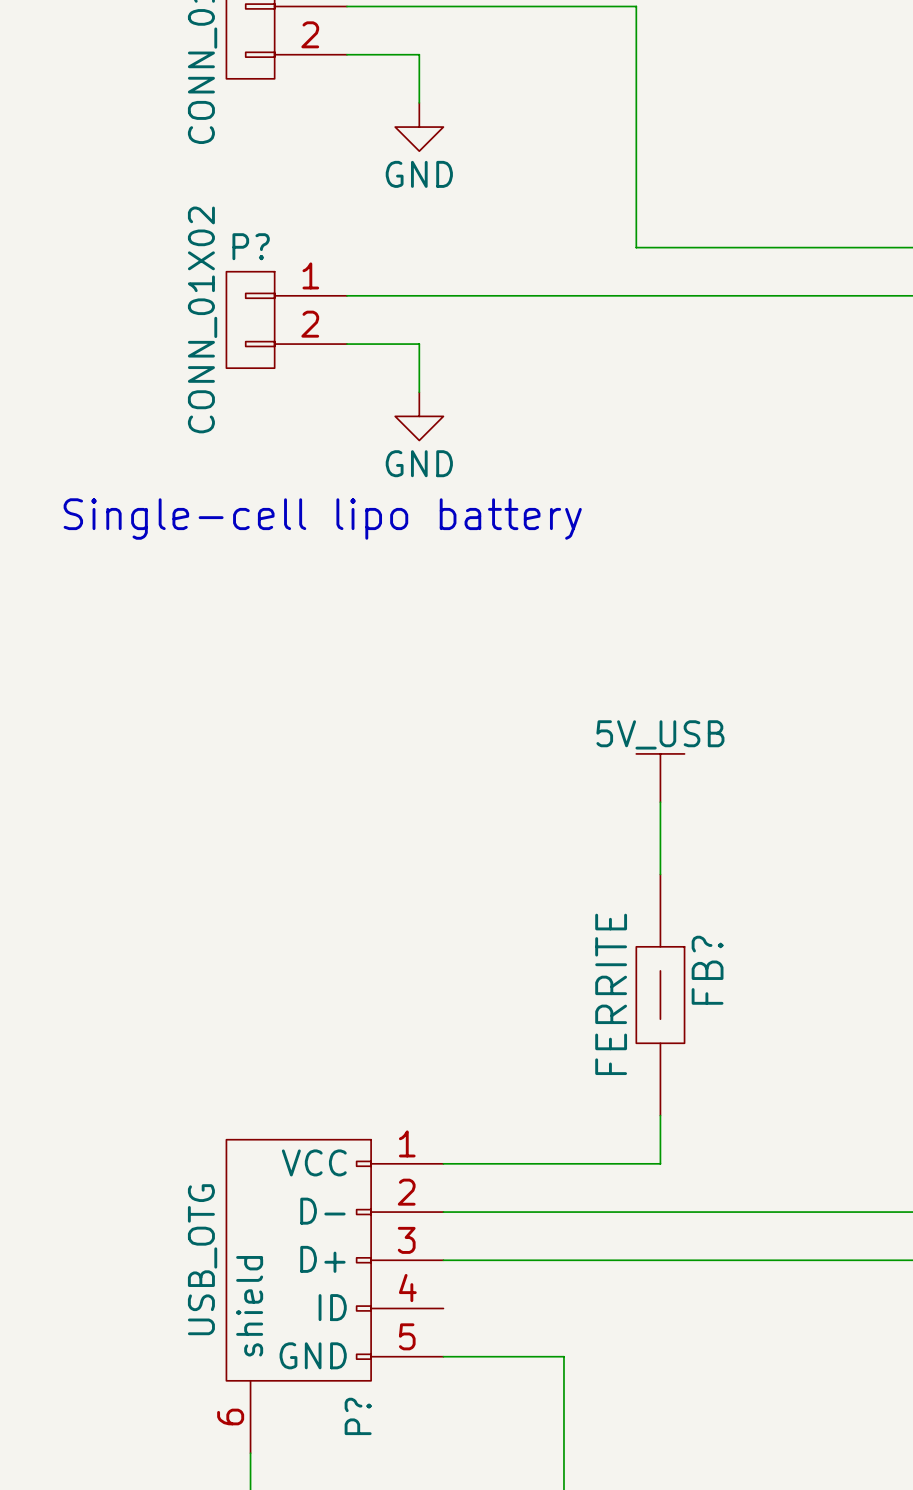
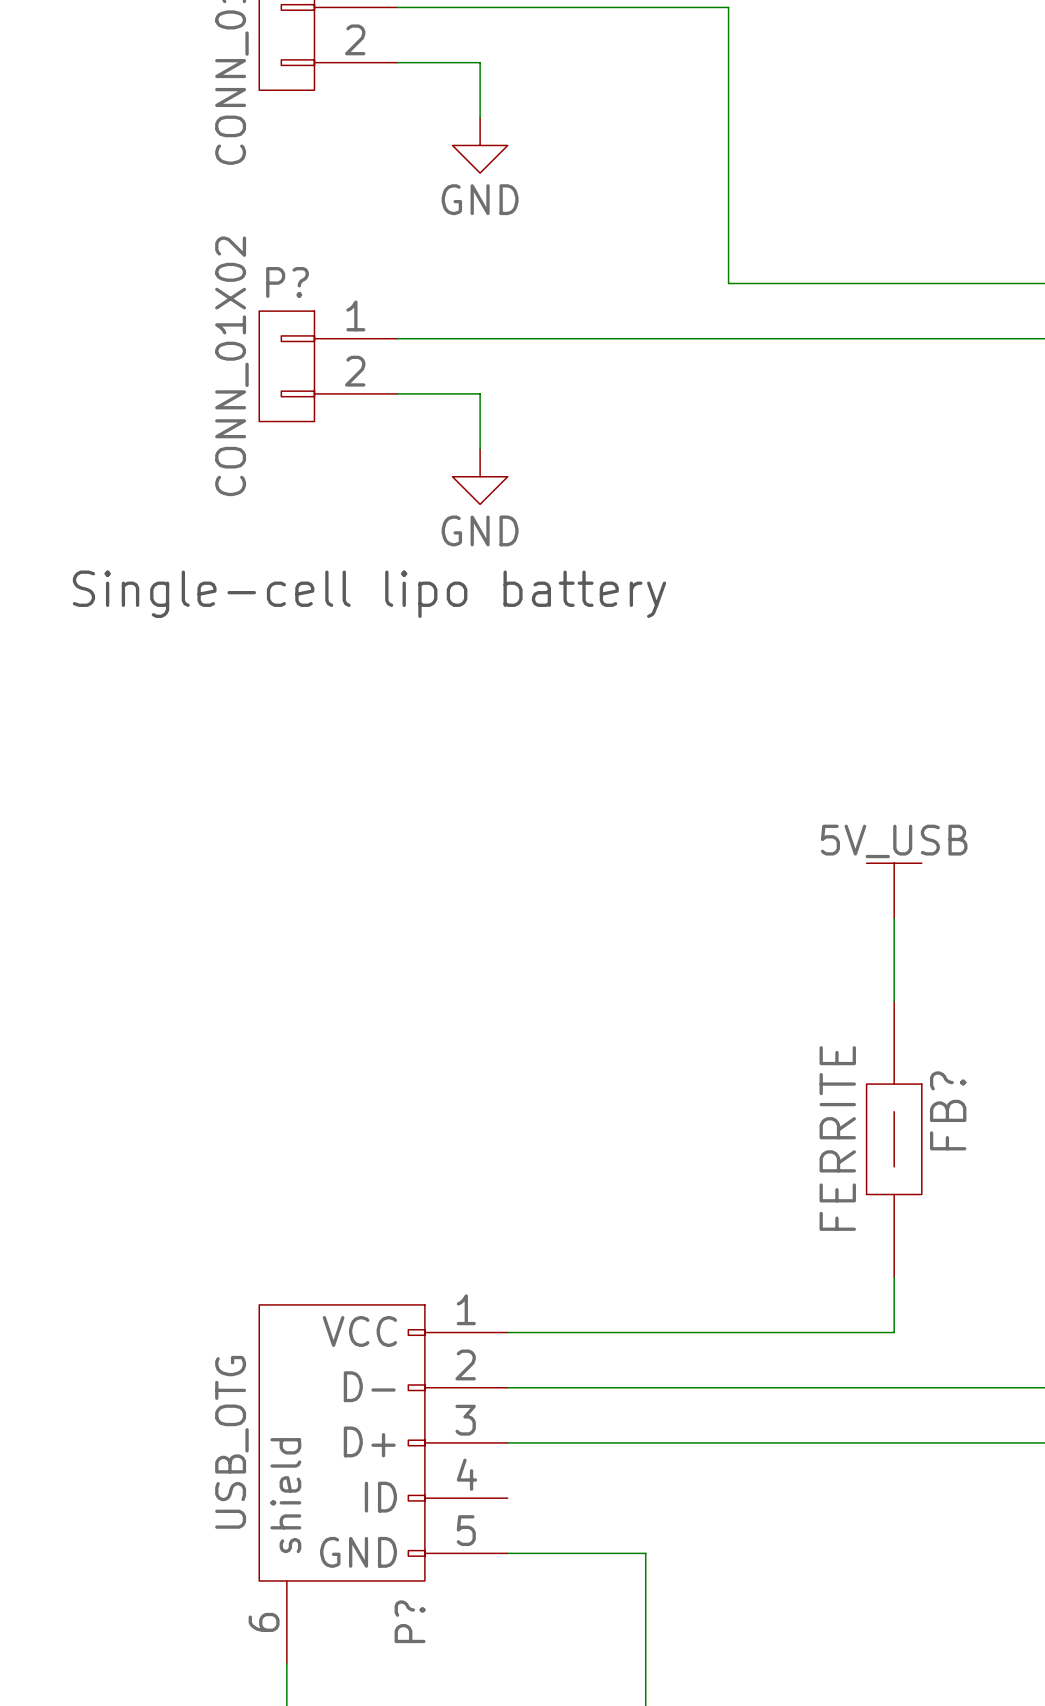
power symbol position: 5V_USB (660, 778) -> 5V_USB (894, 890)
wire: (660, 802) (660, 874) -> (894, 918) (894, 1001)
FB? position: (660, 995) -> (894, 1139)
wire: (660, 1115) (660, 1163) -> (894, 1277) (894, 1332) (756, 1332)

